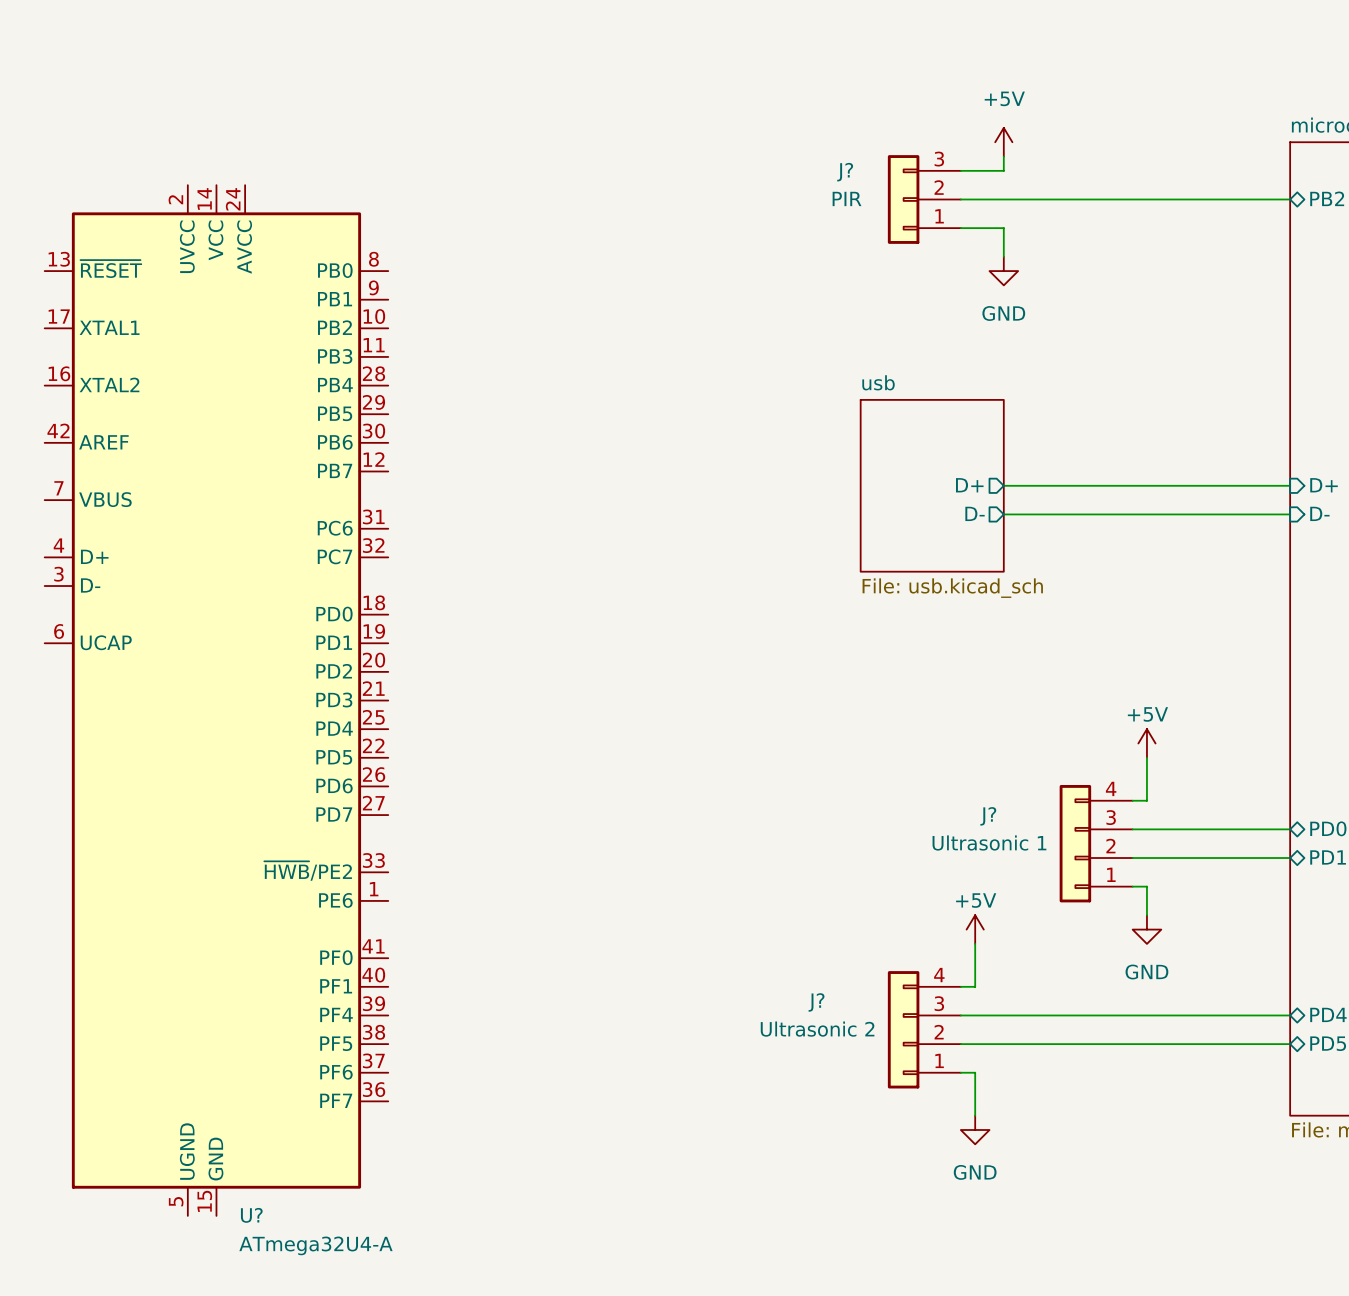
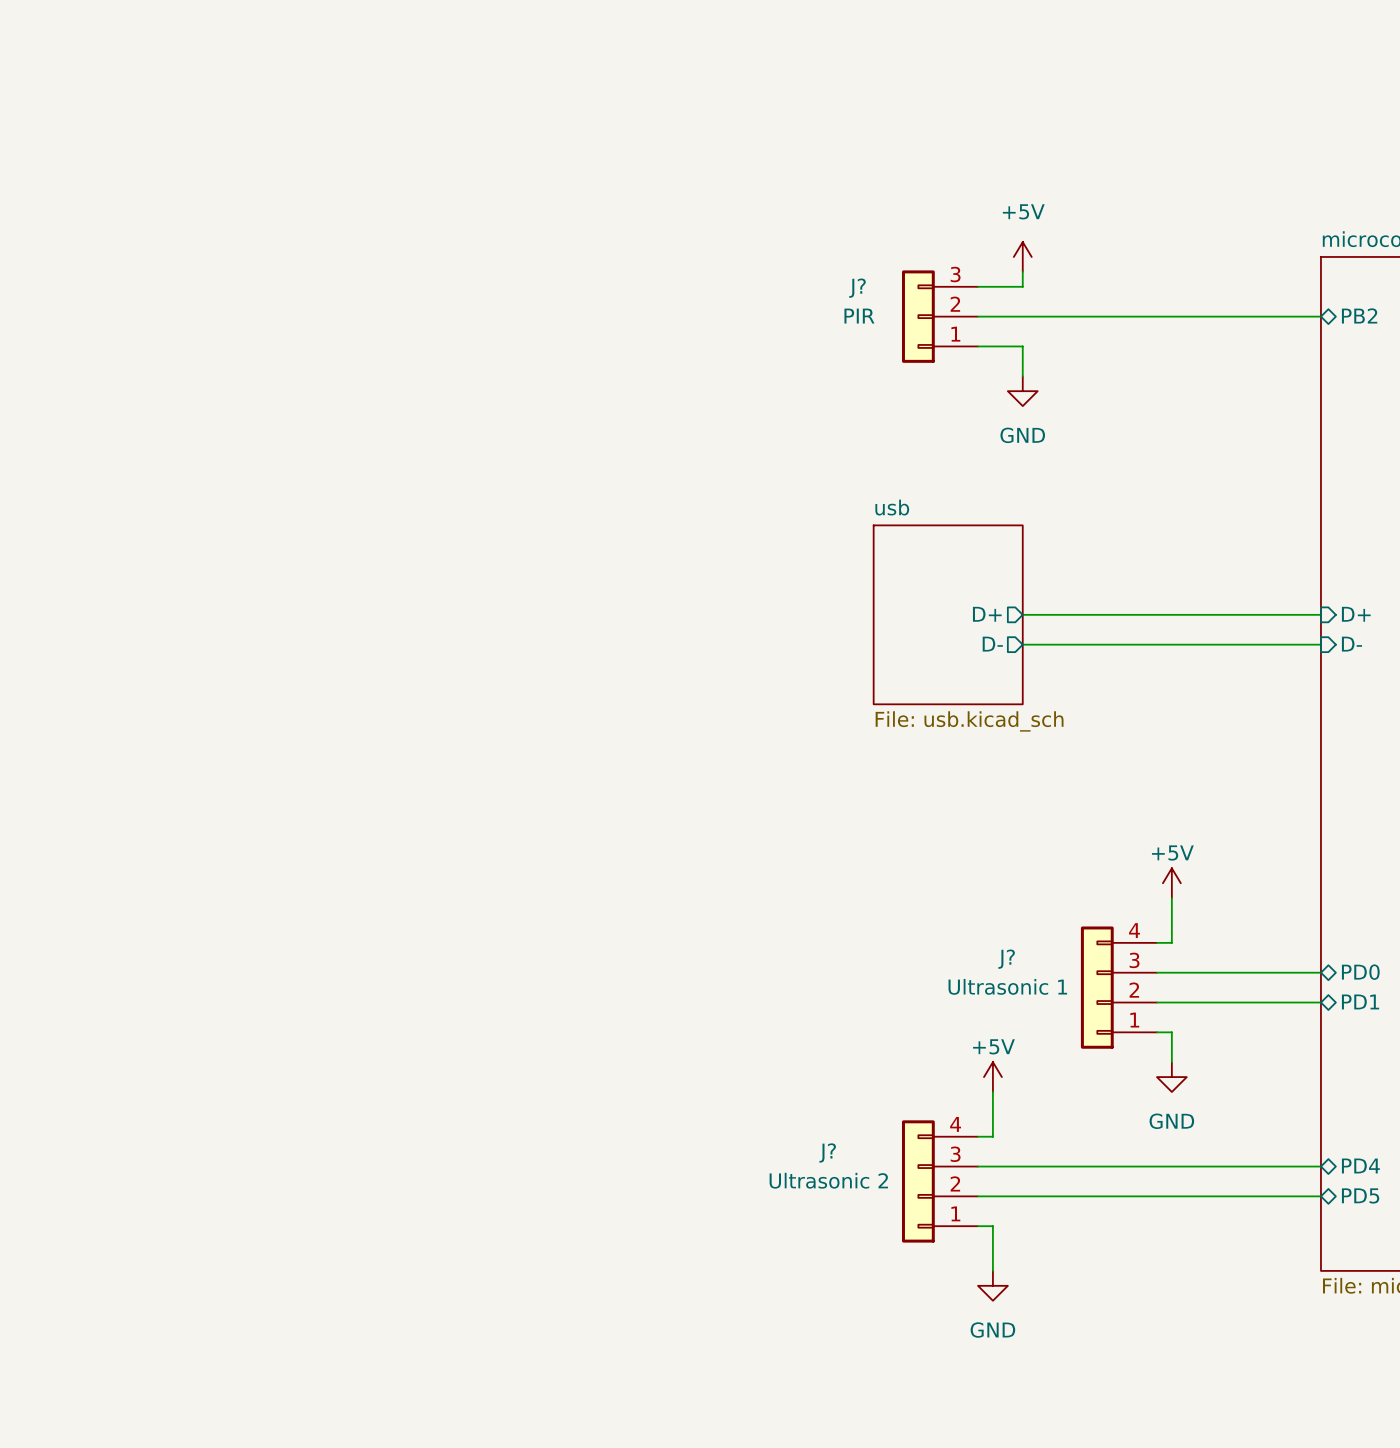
U?: ATmega32U4-A (216, 700) -> none

